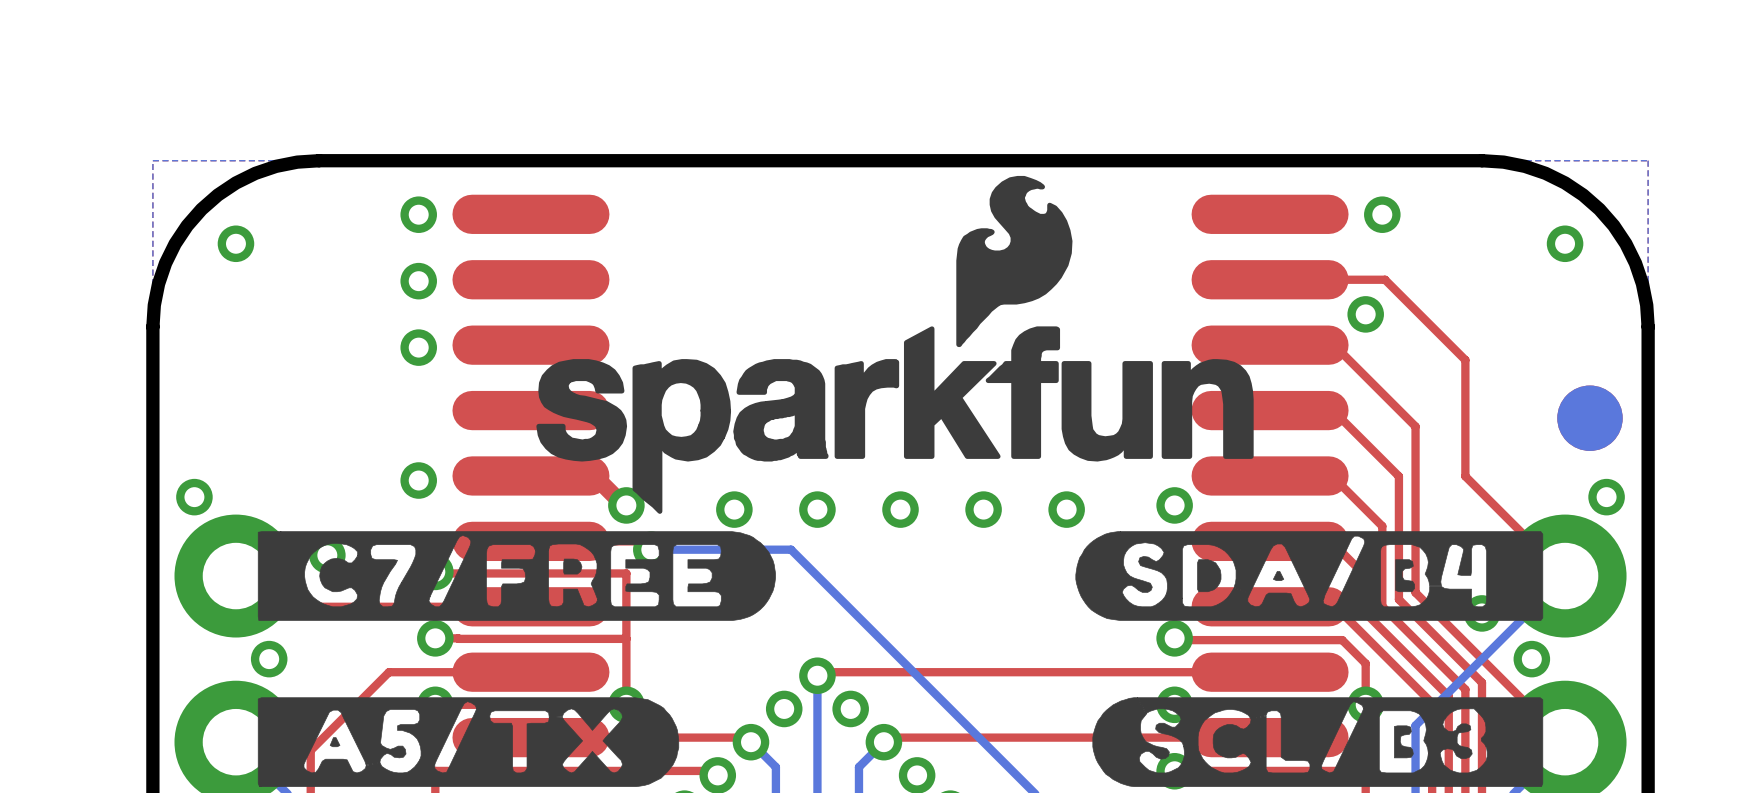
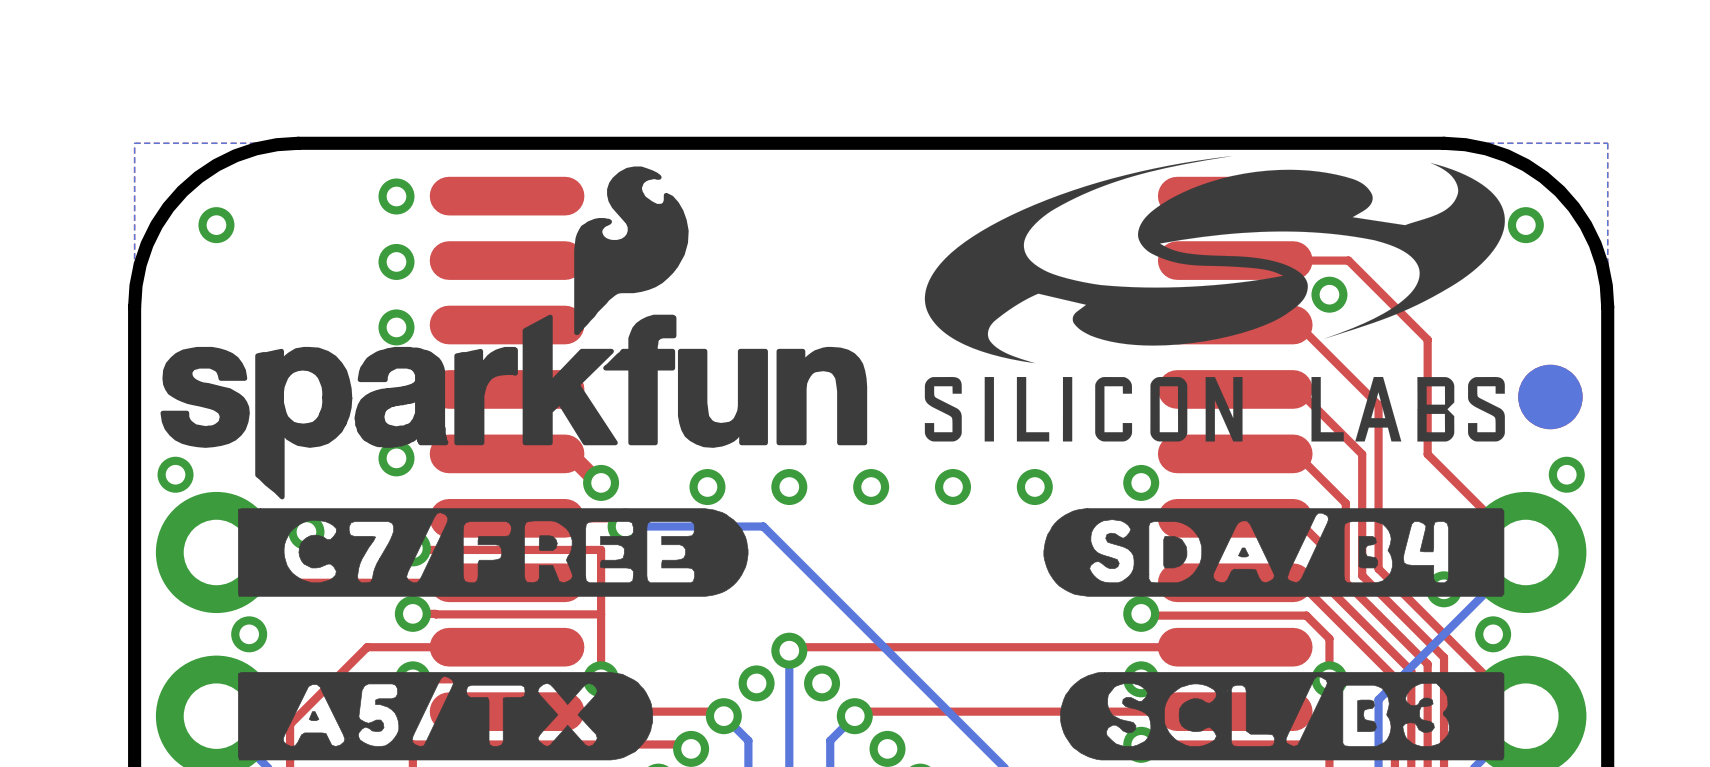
drawing: none -> [924, 156, 1505, 442]
drawing position: (895, 344) -> (513, 332)

